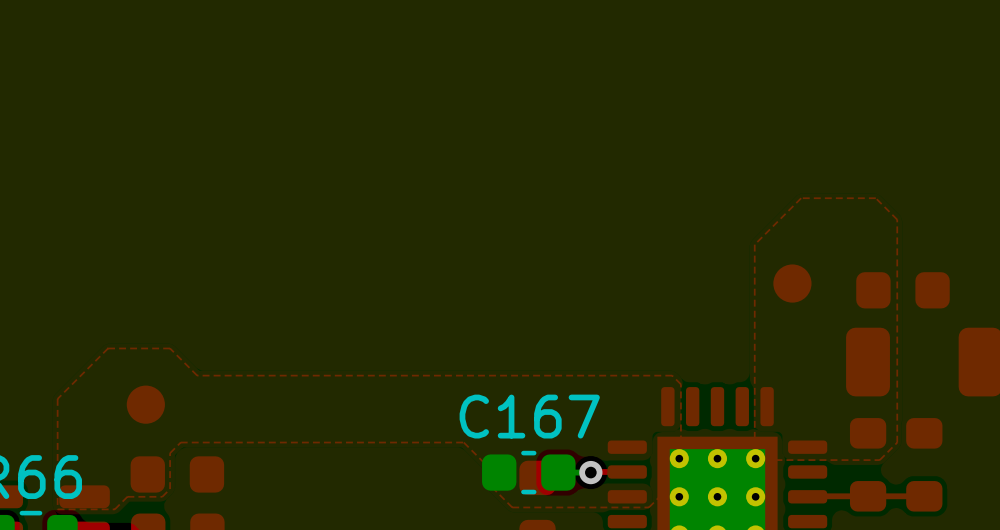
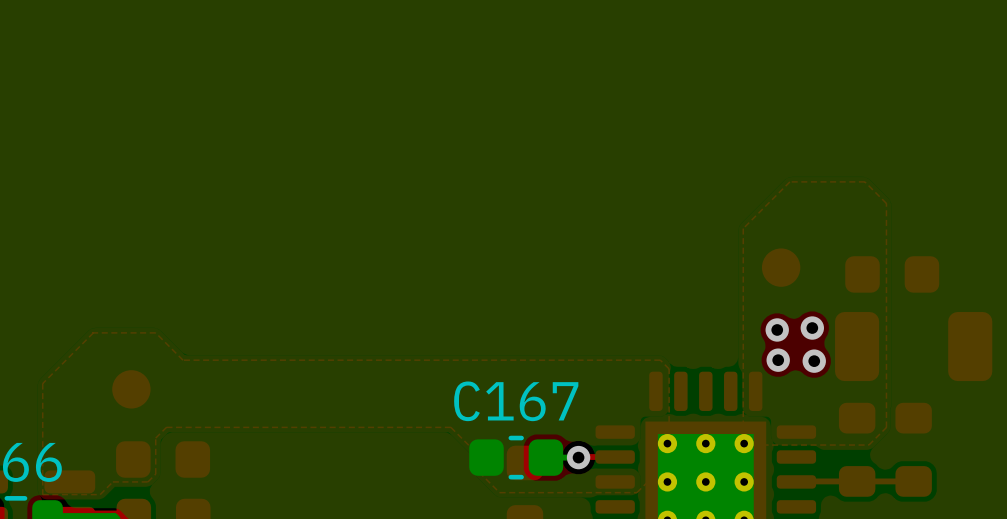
via: none -> (812, 328)
via: none -> (777, 329)
via: none -> (778, 360)
via: none -> (814, 361)

